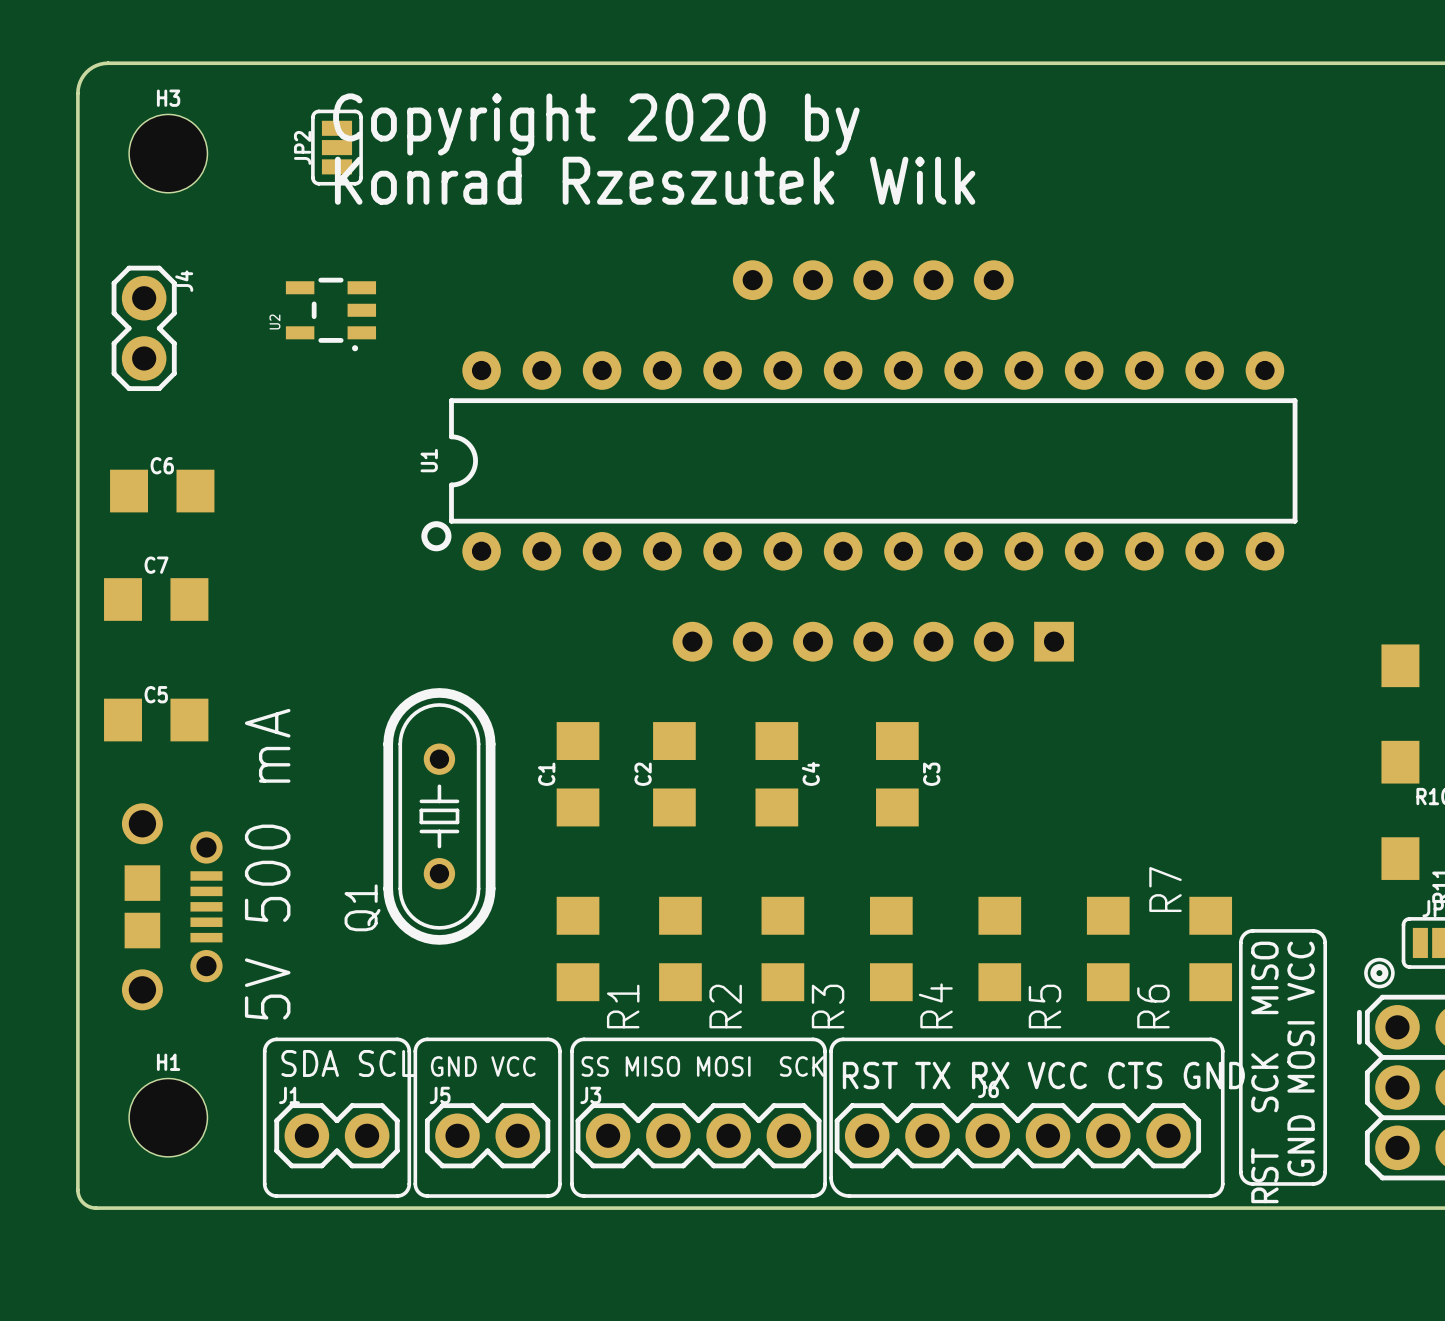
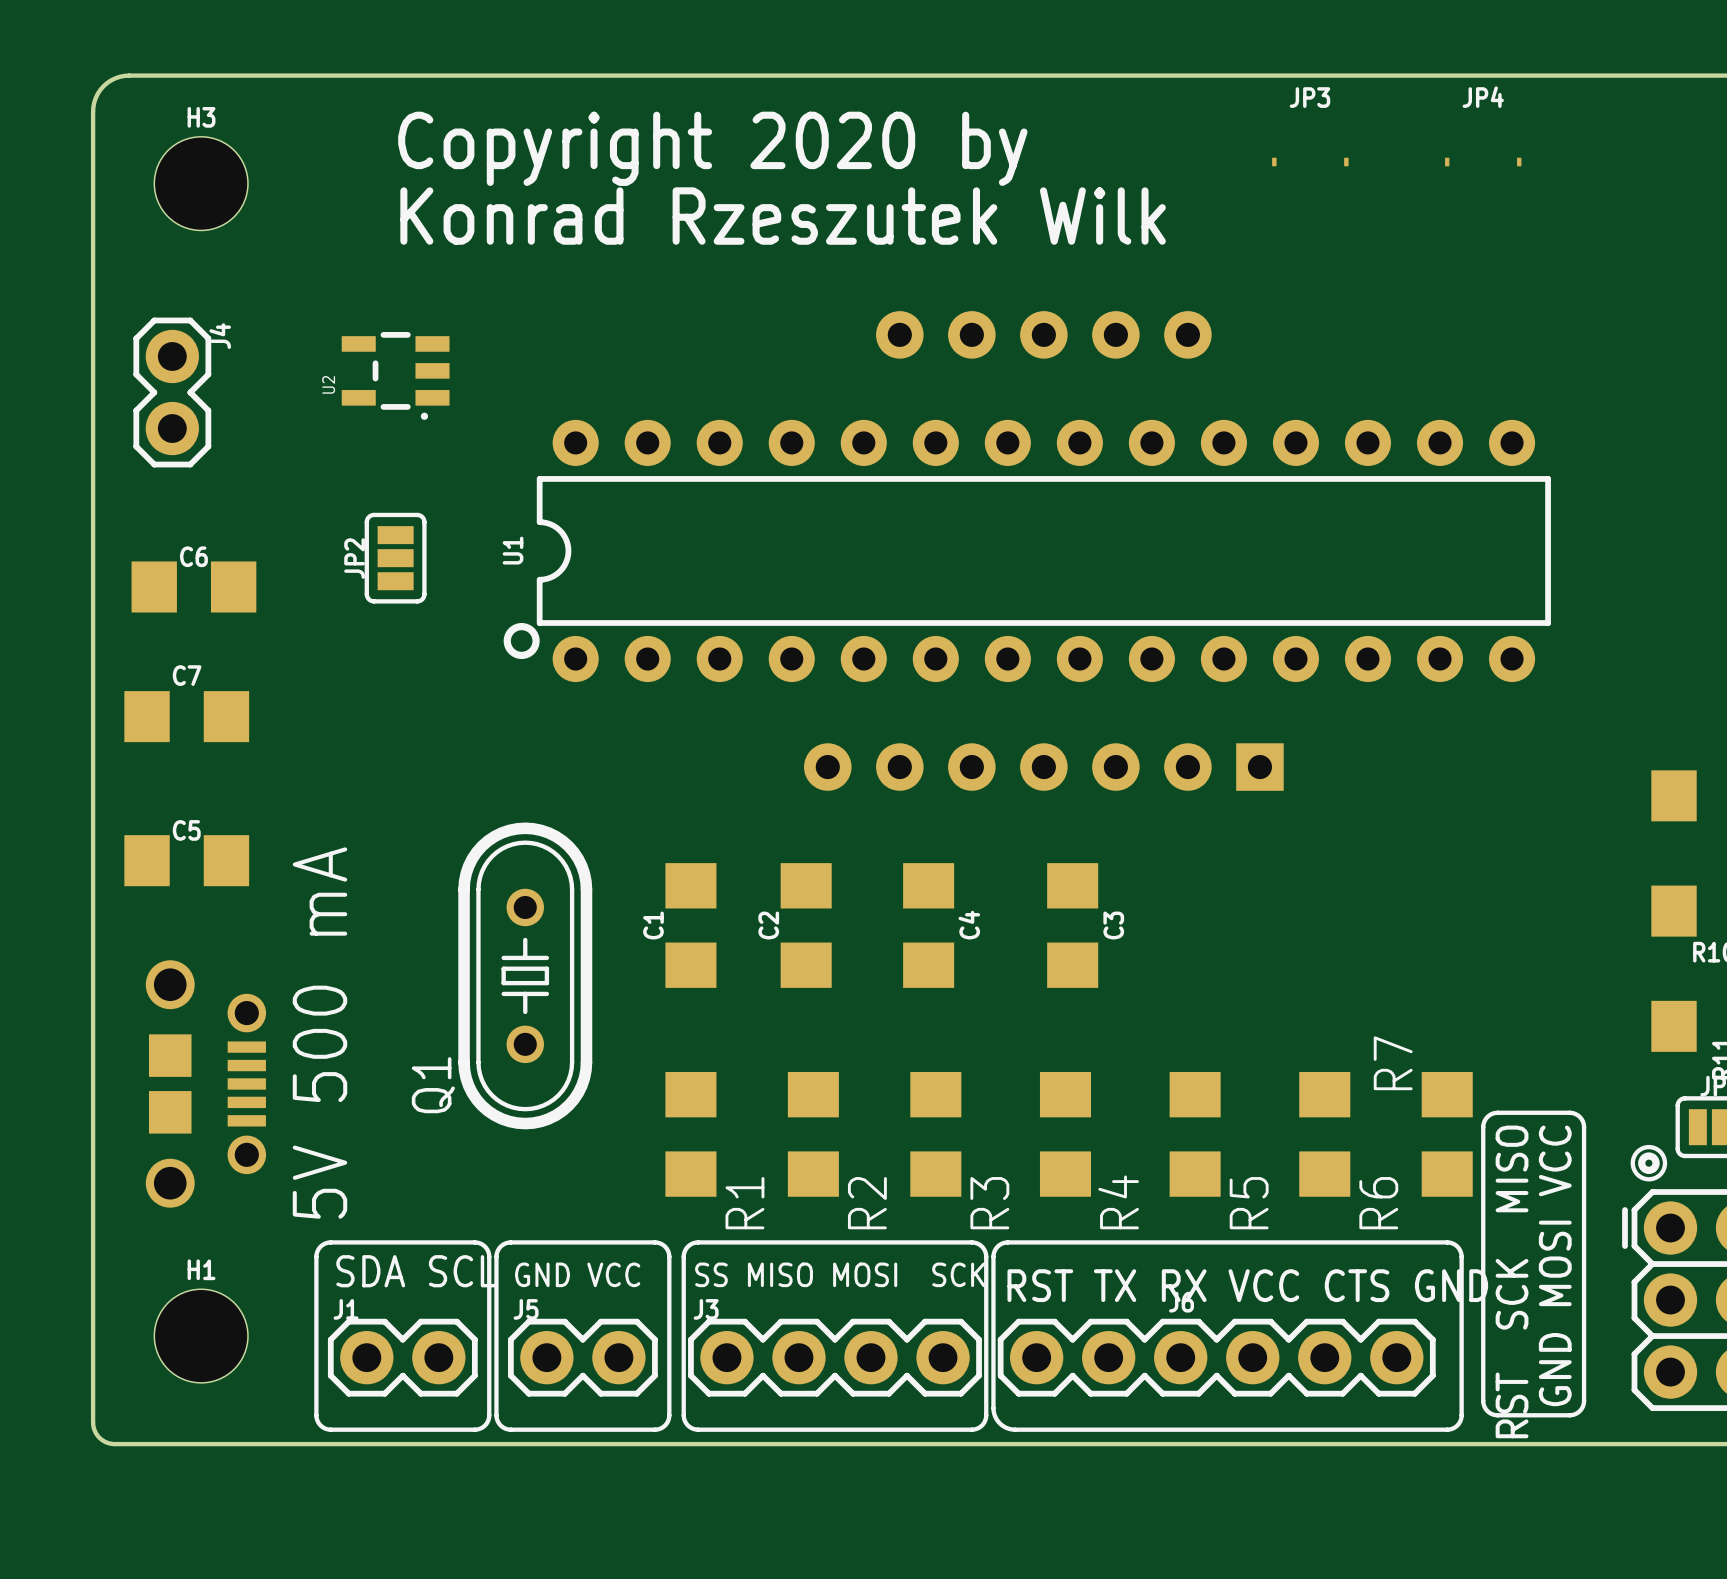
JP3: none -> (1310, 162)
JP4: none -> (1483, 162)
JP2 position: (336, 147) -> (395, 558)

